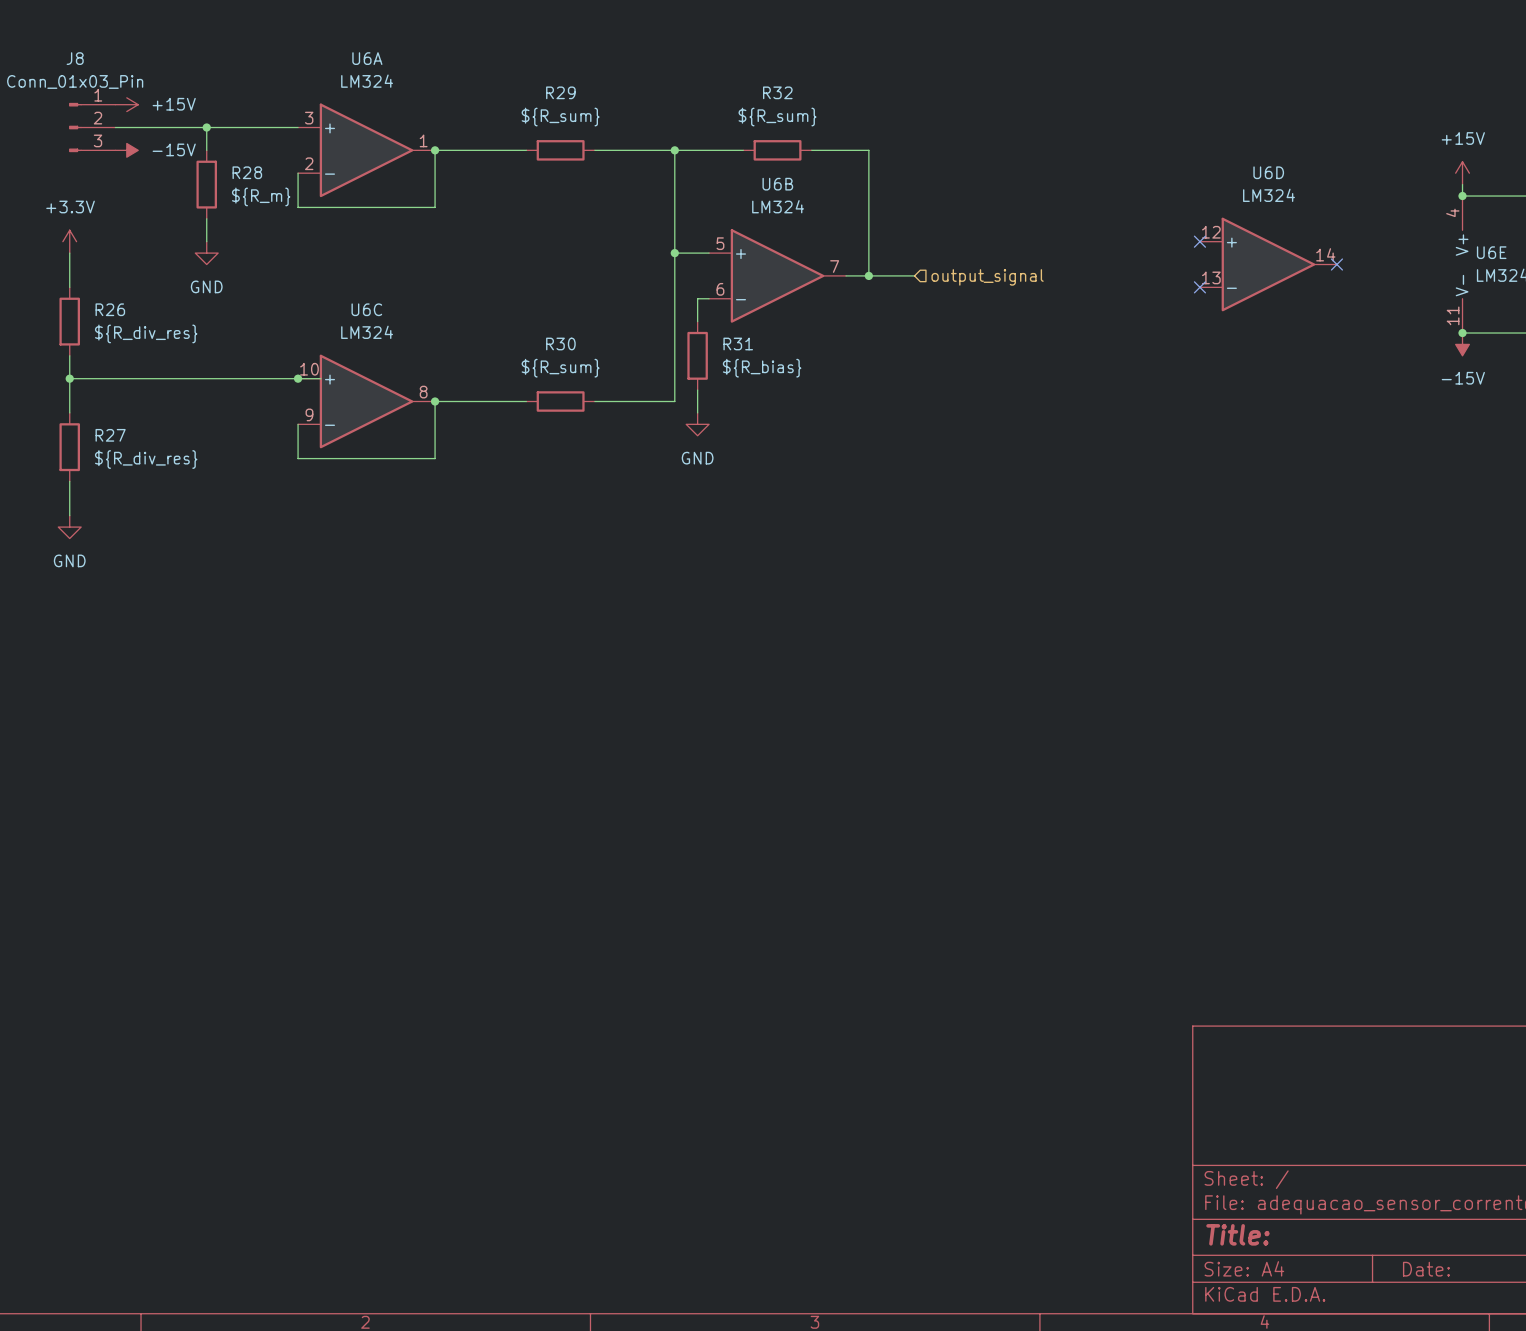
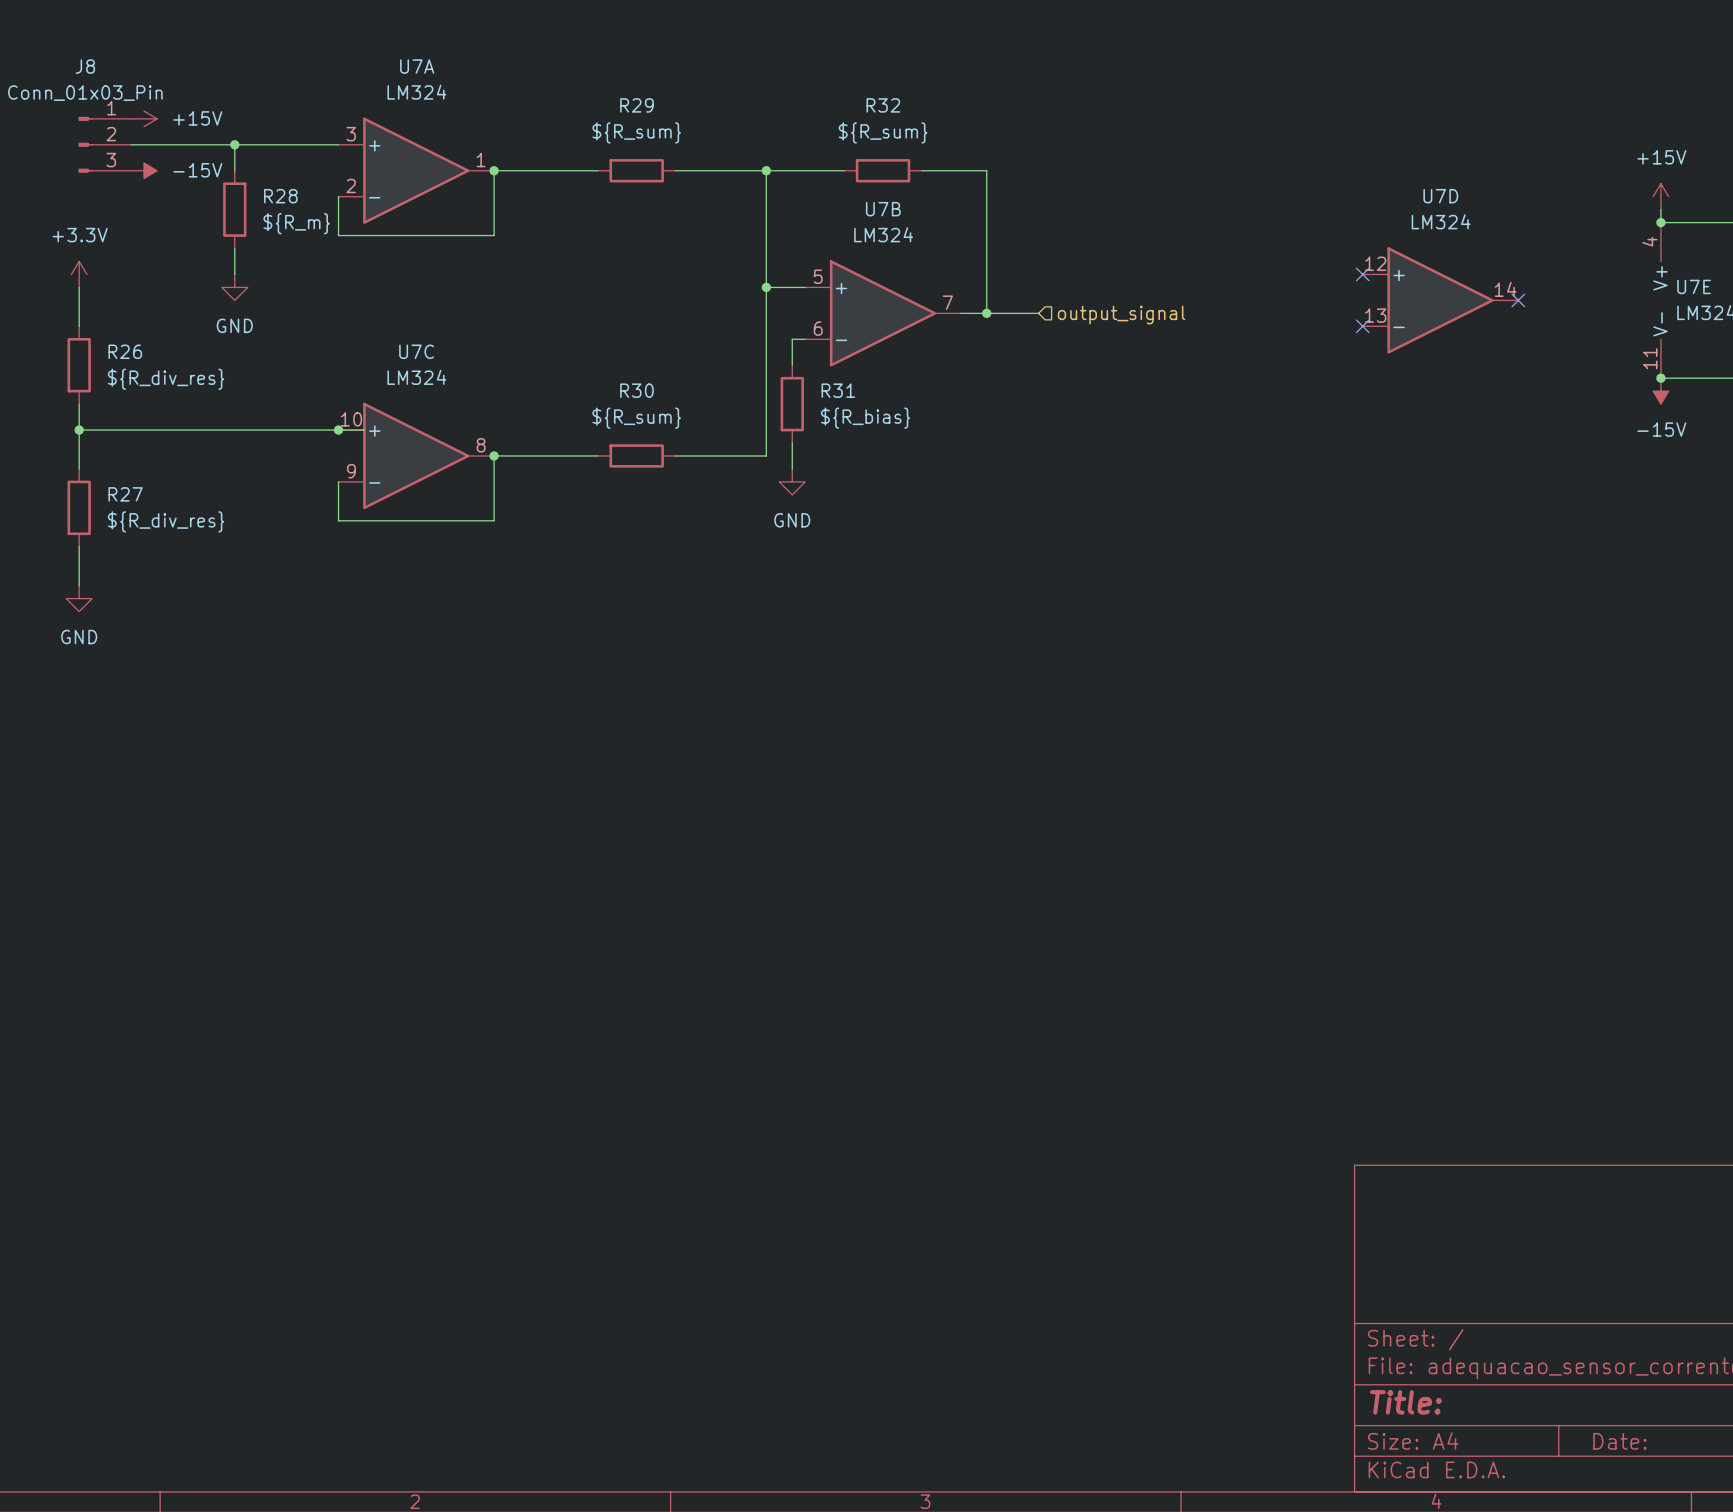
U6A name: U6A (367, 58) -> U7A (417, 66)
U6D name: U6D (1268, 172) -> U7D (1440, 196)
U6B name: U6B (777, 184) -> U7B (883, 209)
U6E name: U6E (1491, 252) -> U7E (1694, 286)
U6C name: U6C (366, 309) -> U7C (416, 351)

